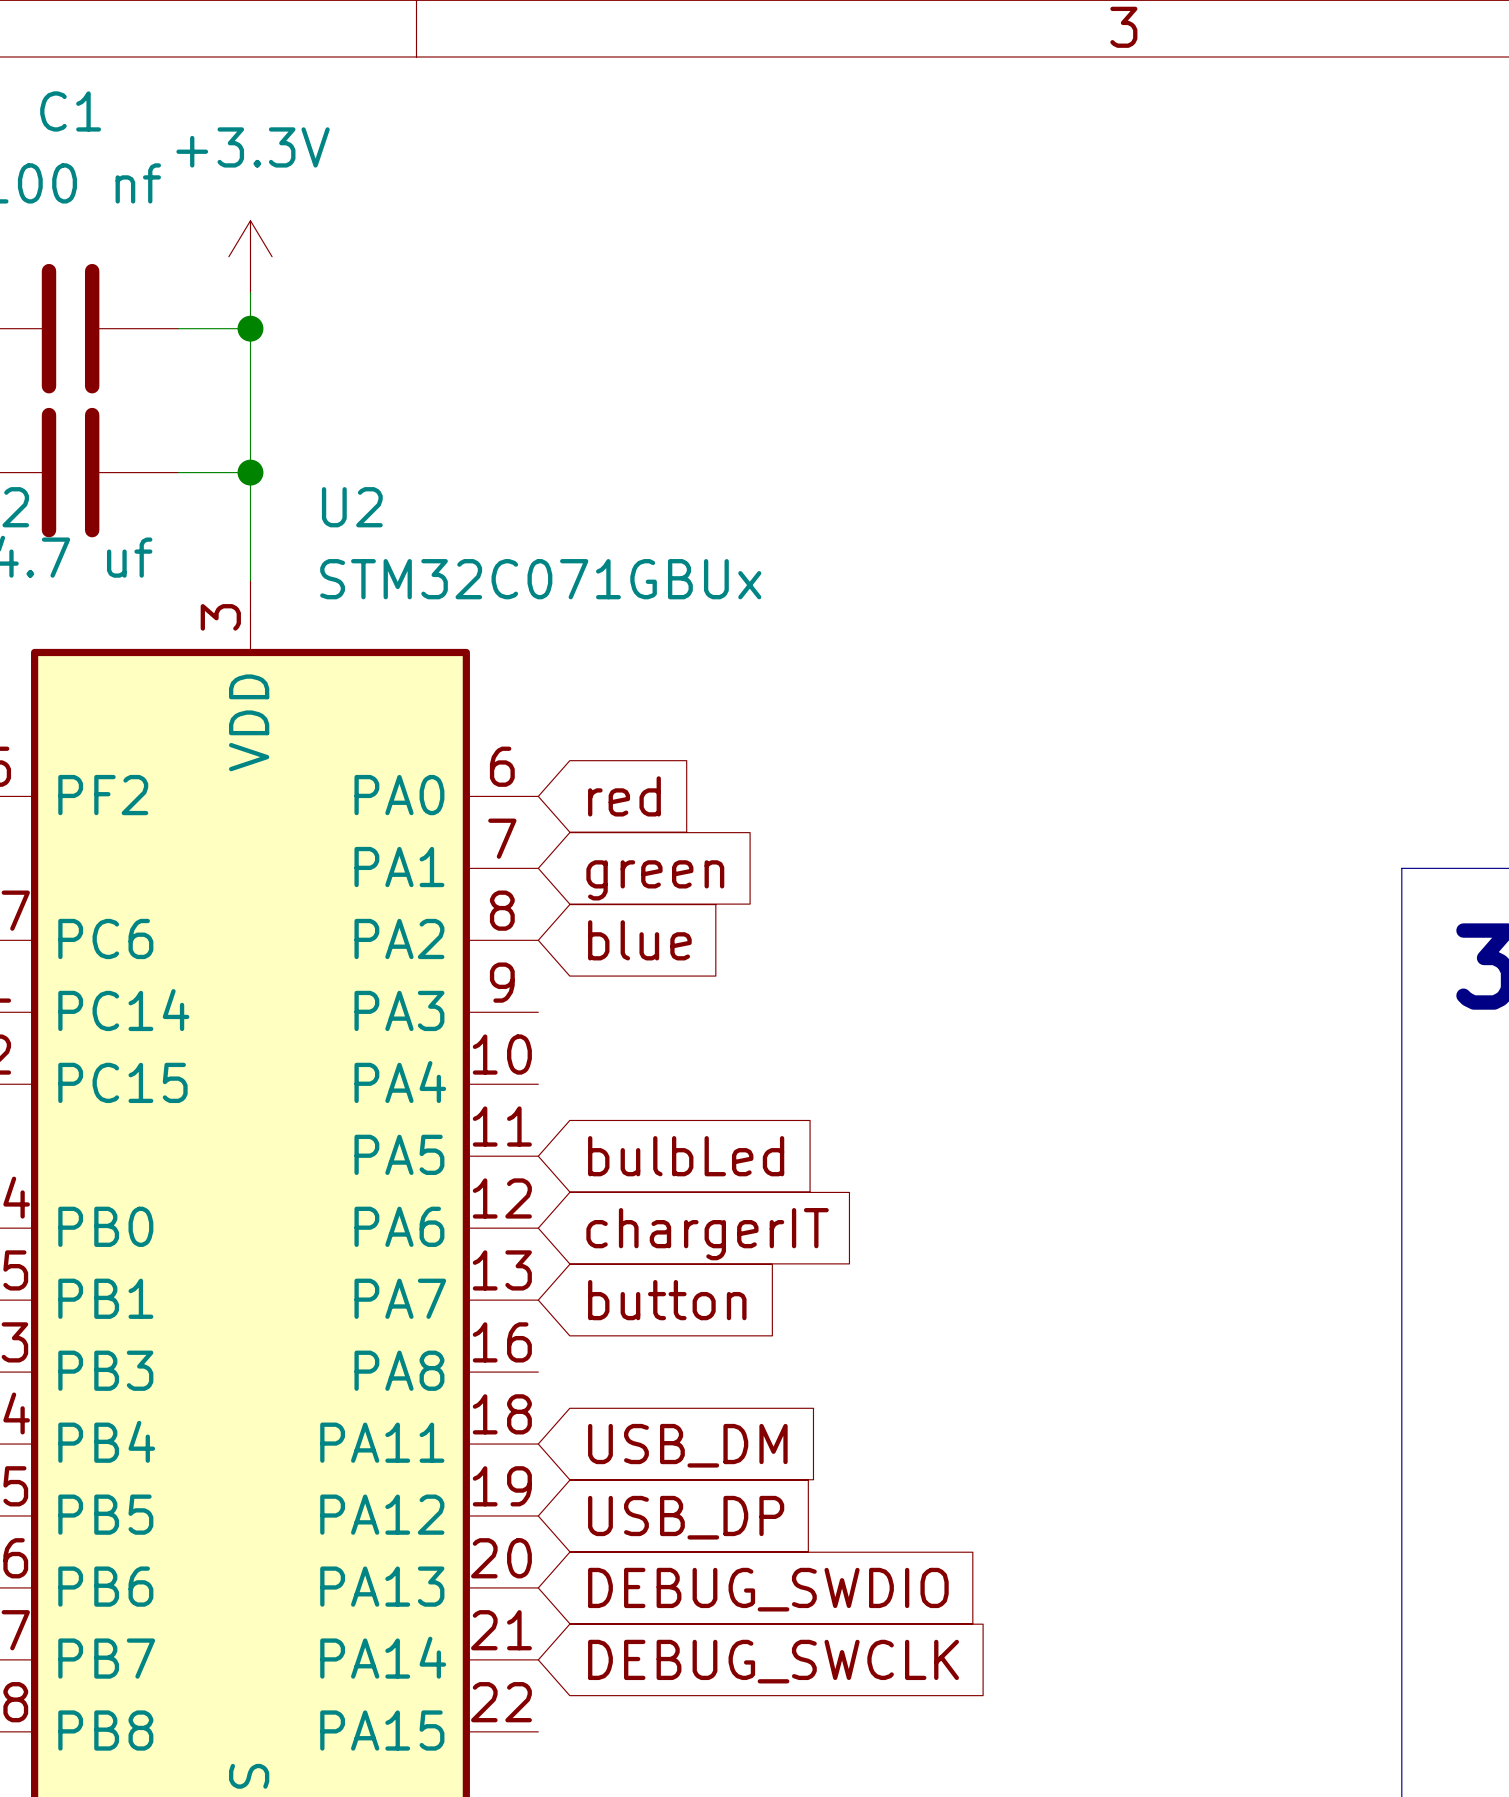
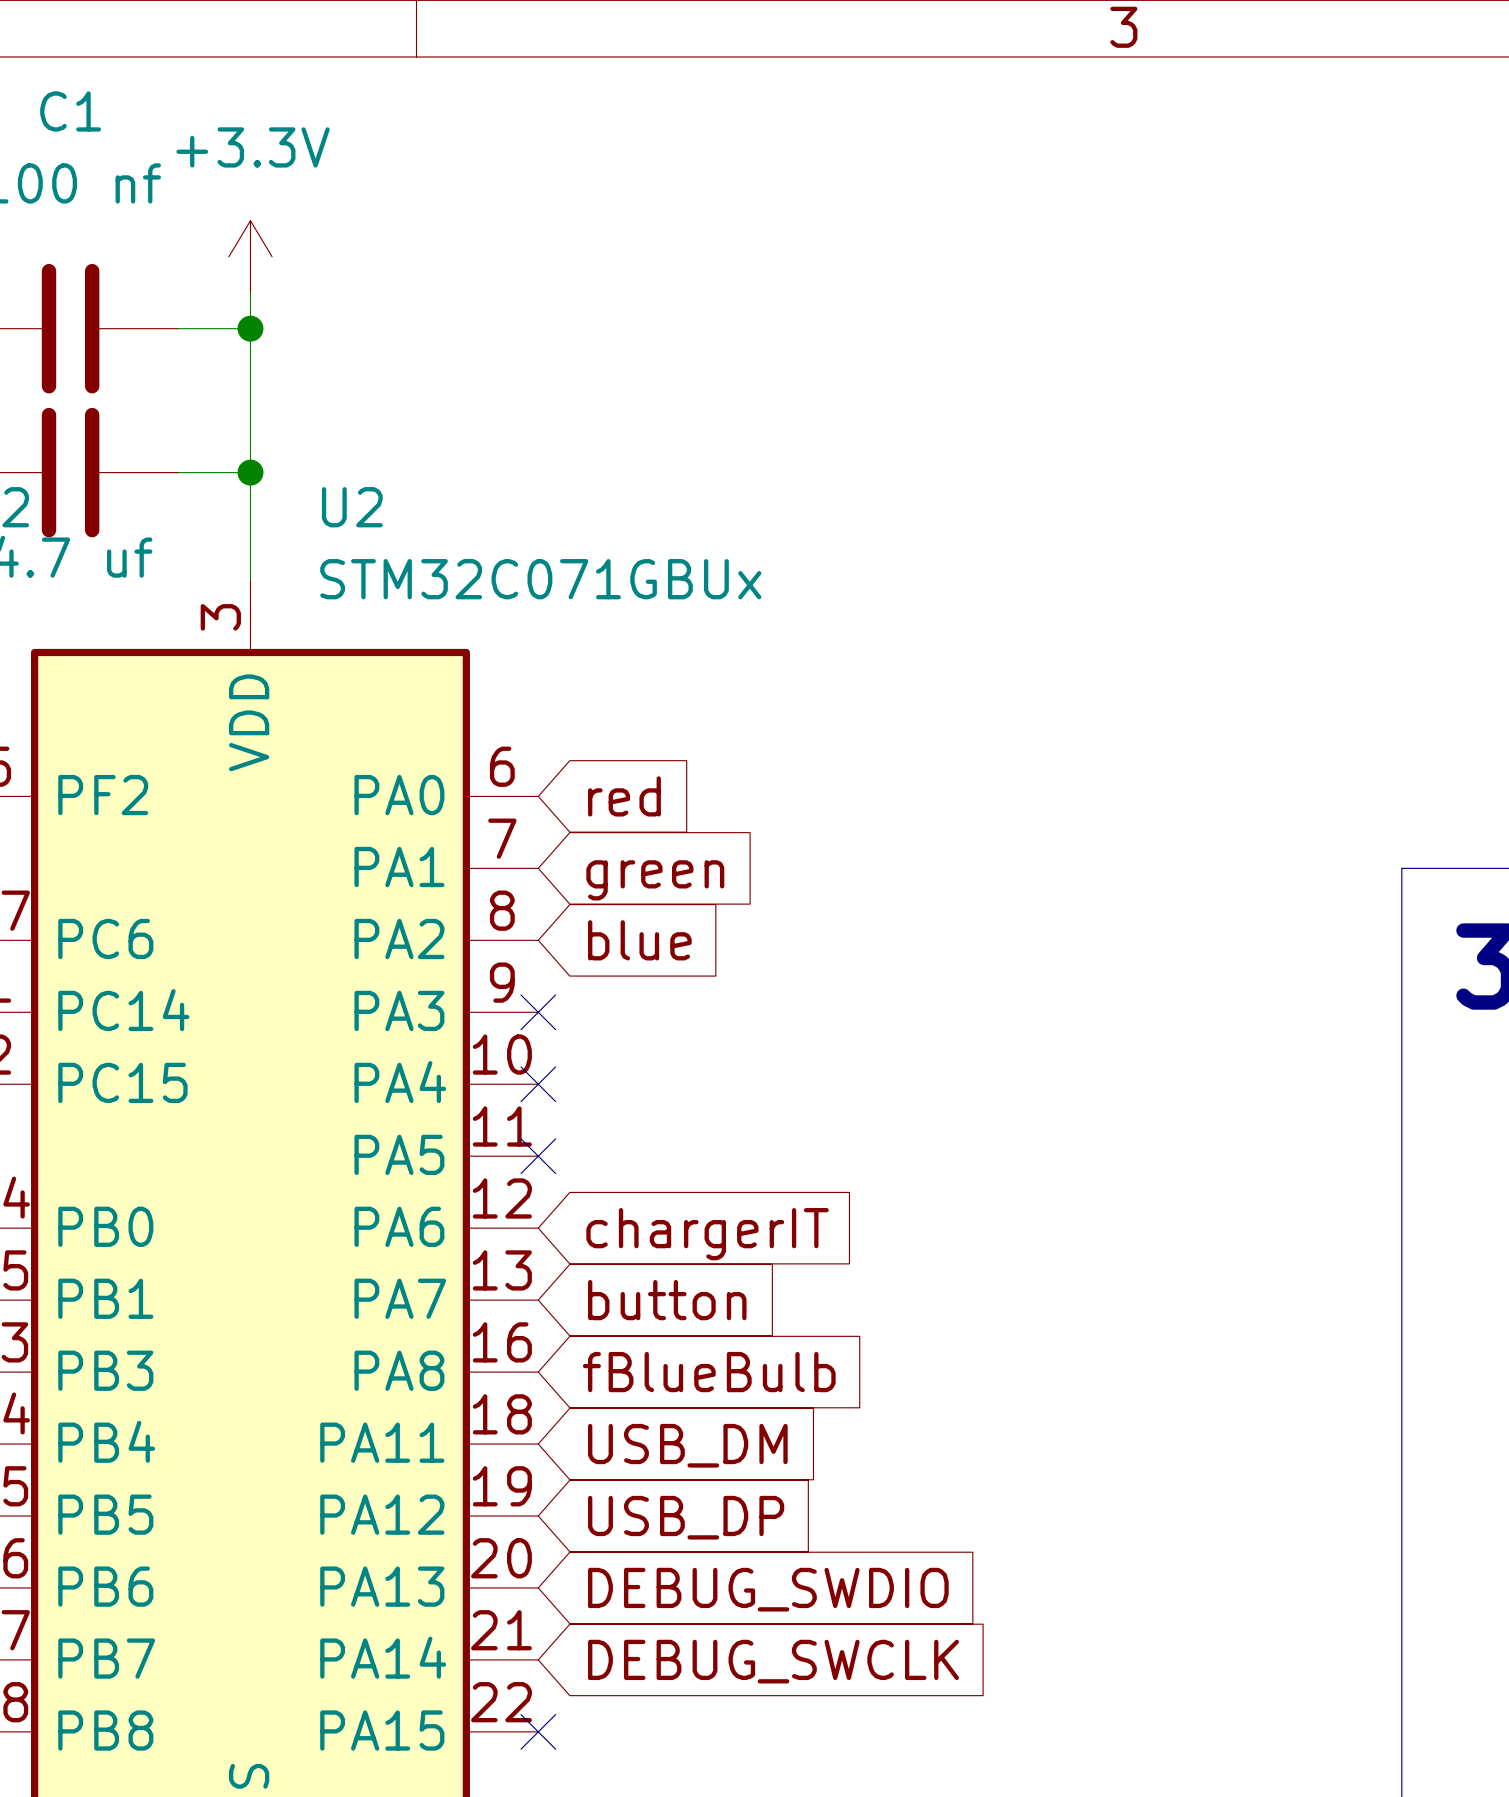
no-connect mark: none -> (538, 1012)
no-connect mark: none -> (538, 1084)
no-connect mark: none -> (538, 1156)
global label: bulbLed (686, 1156) -> none
global label: none -> fBlueBulb (709, 1372)
no-connect mark: none -> (538, 1731)

